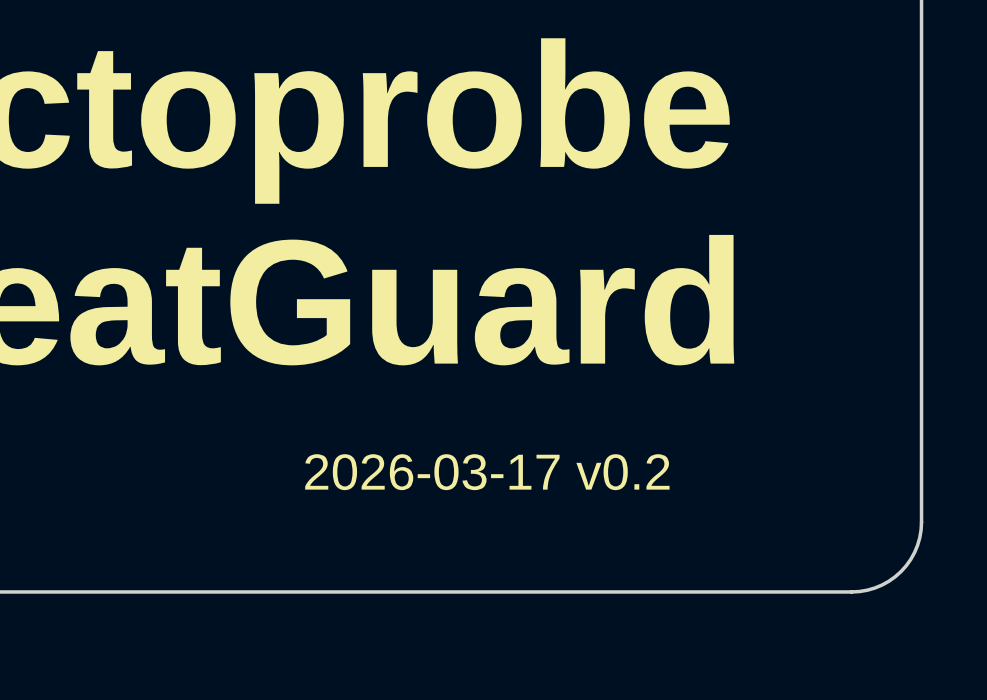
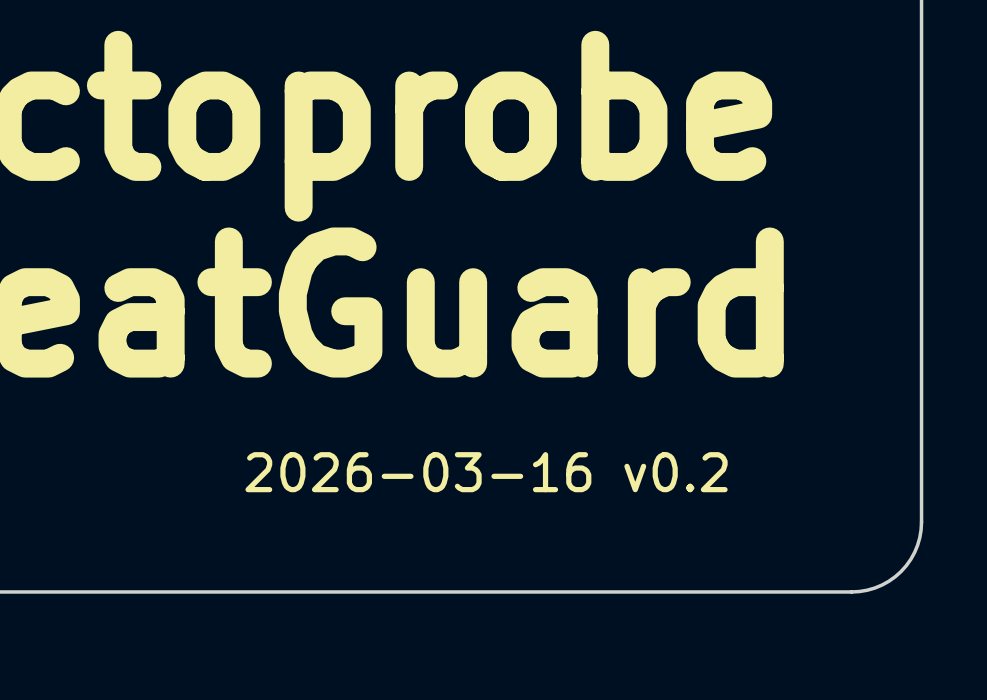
text: 2026-03-17 v0.2 (487, 472) -> 2026-03-16 v0.2 (486, 472)

